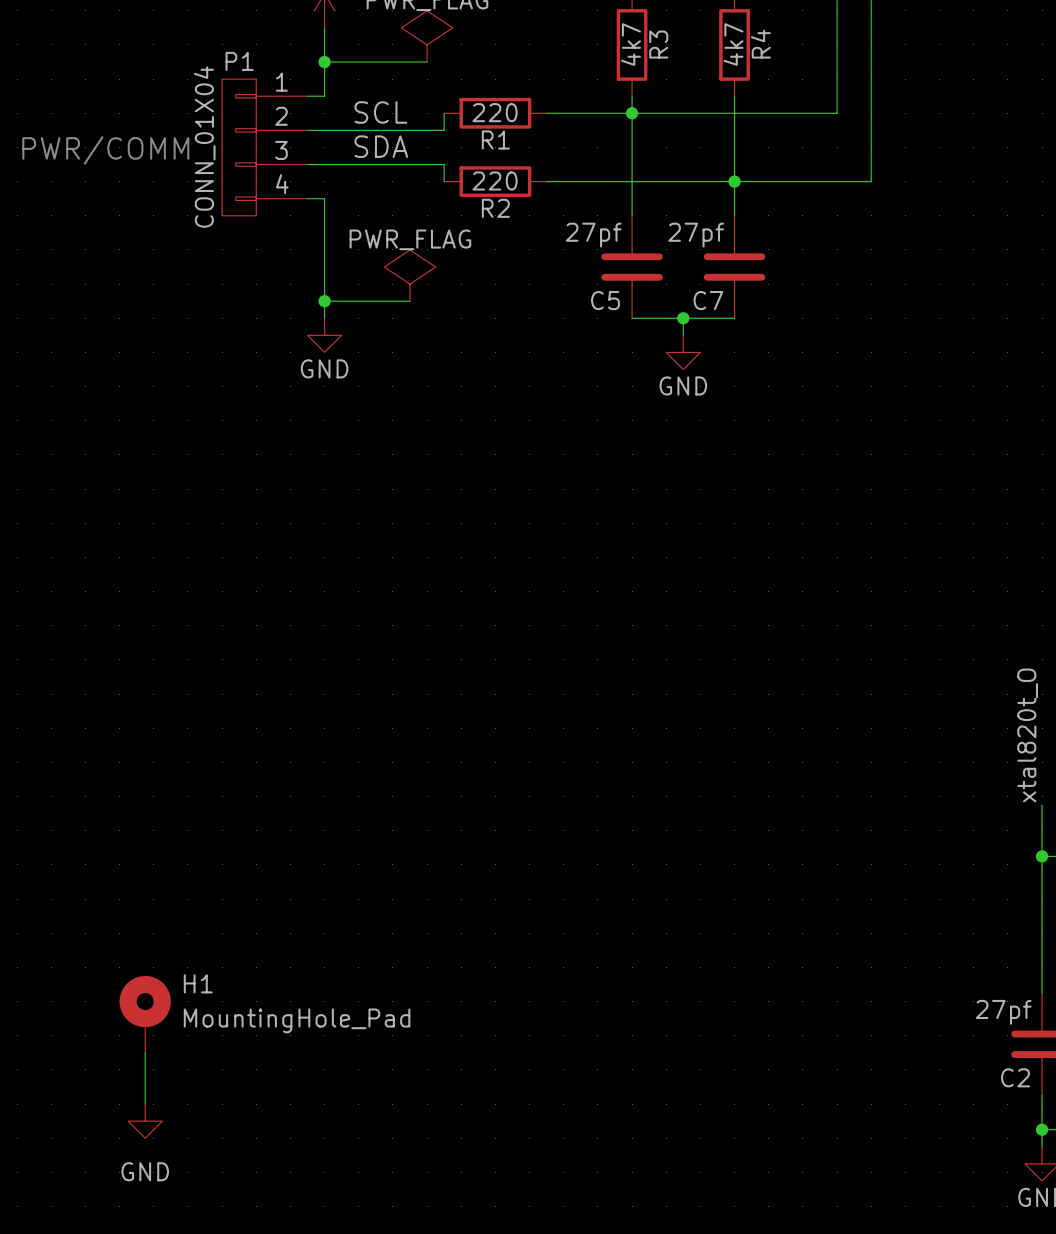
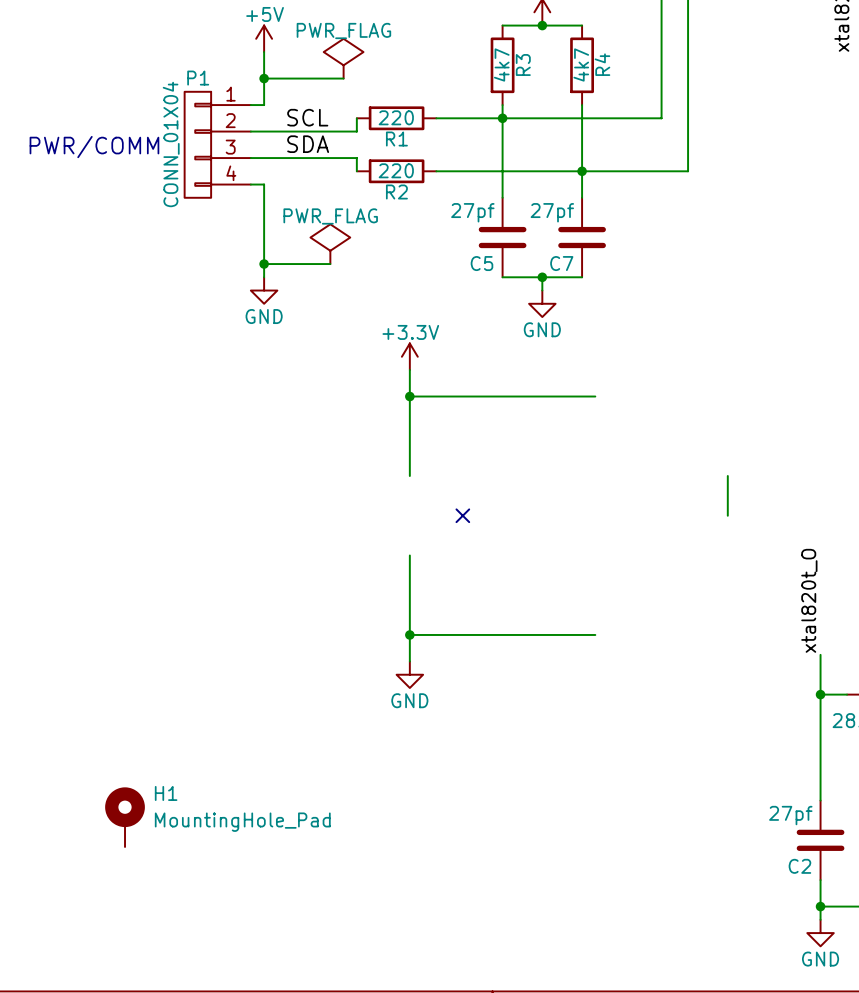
power symbol: none -> +3.3V (409, 356)
wire: none -> (409, 370) (409, 476)
wire: none -> (409, 396) (595, 396)
junction: none -> (409, 396)
wire: none -> (727, 476) (727, 515)
no-connect mark: none -> (462, 515)
wire: none -> (409, 555) (409, 661)
wire: none -> (409, 634) (595, 634)
junction: none -> (409, 634)
power symbol: none -> GND (409, 674)
wire: (145, 1052) (145, 1104) -> none
power symbol: GND (145, 1121) -> none

